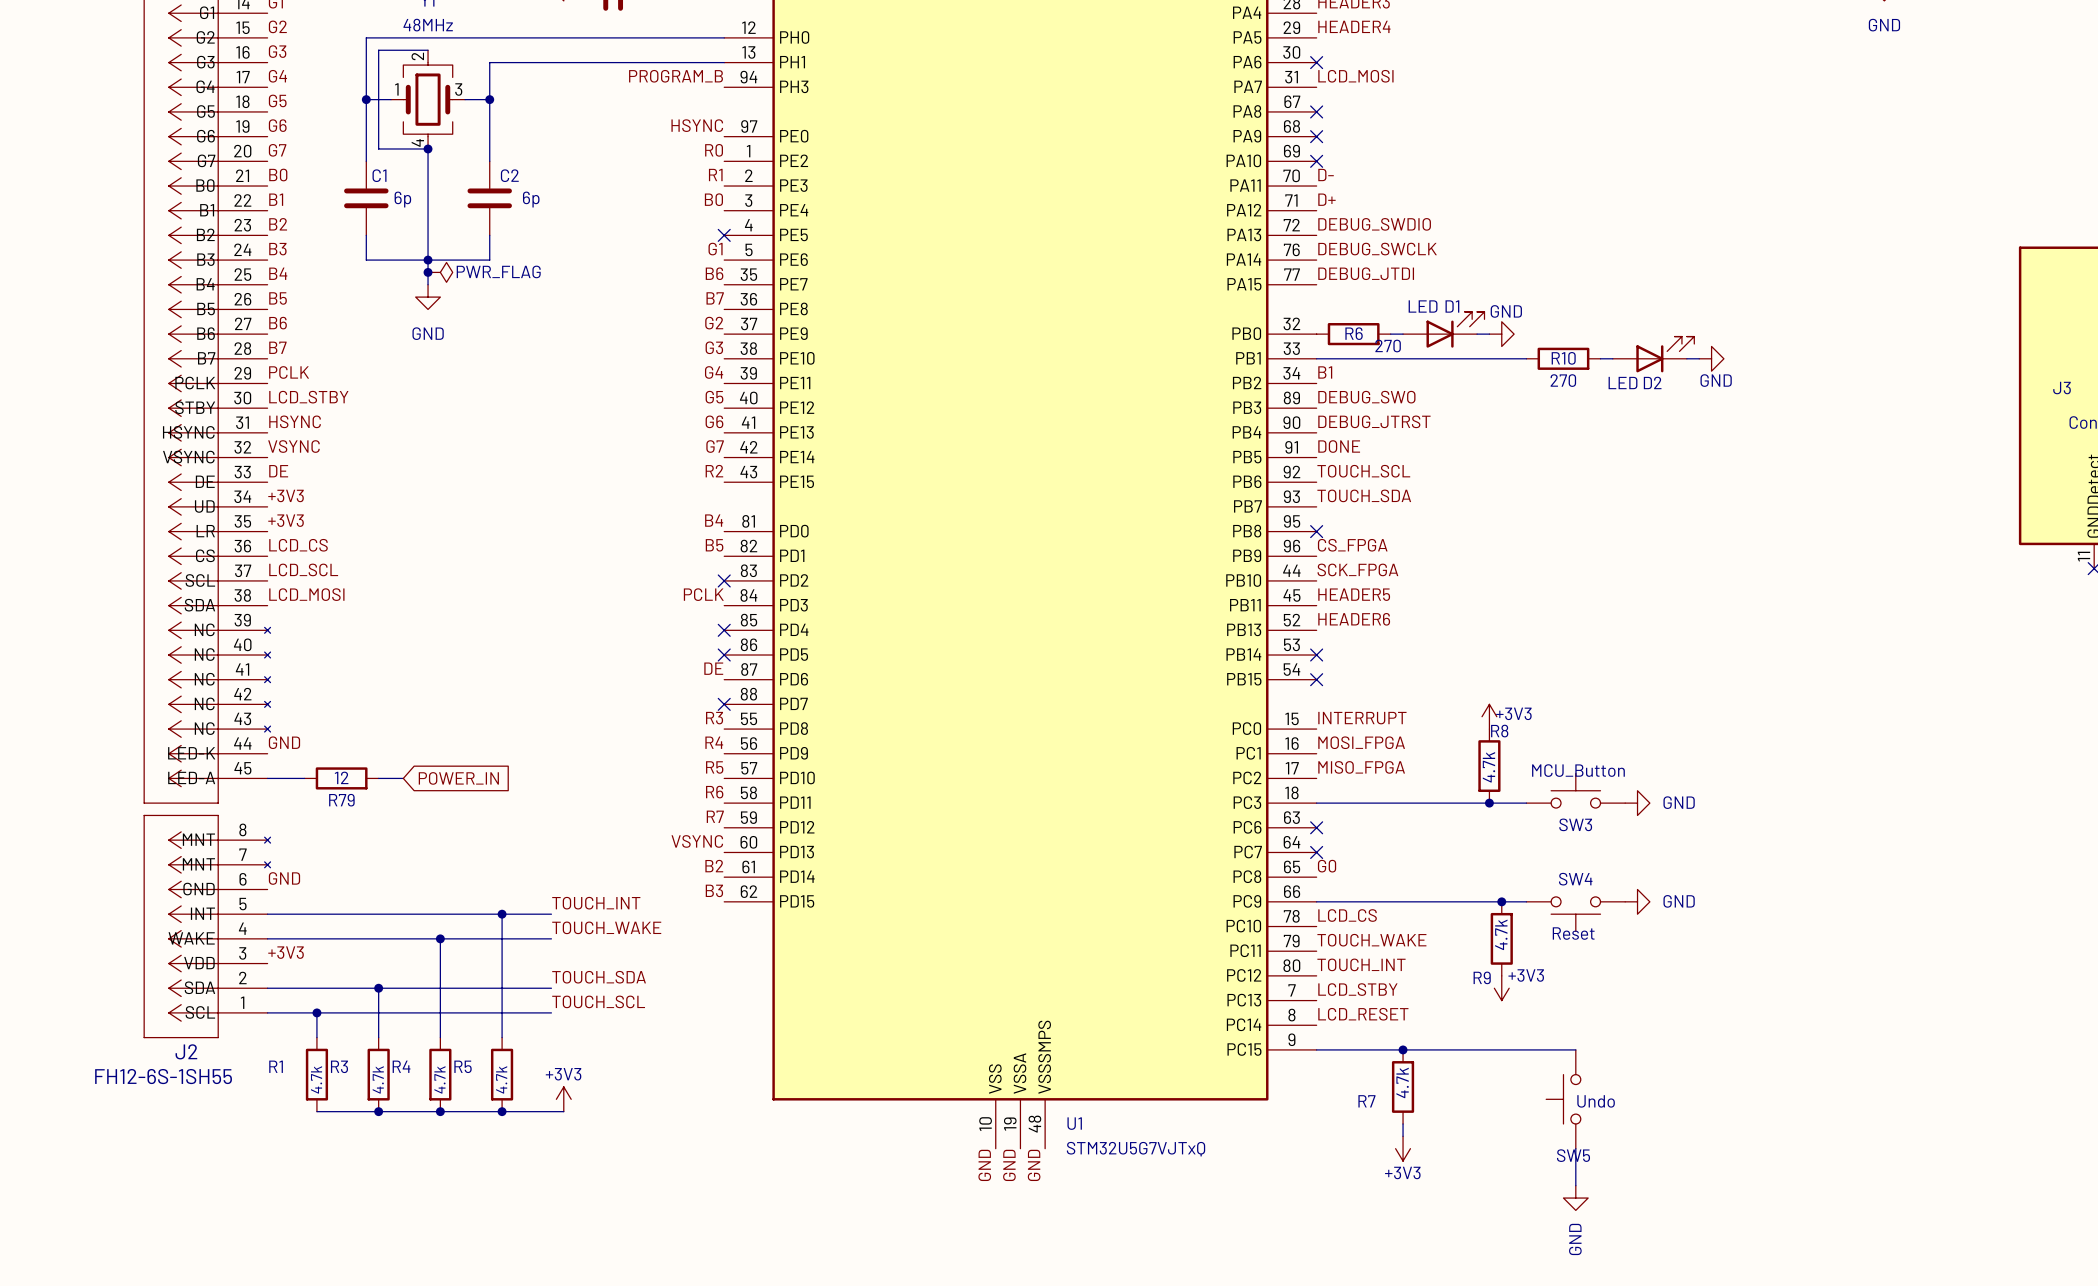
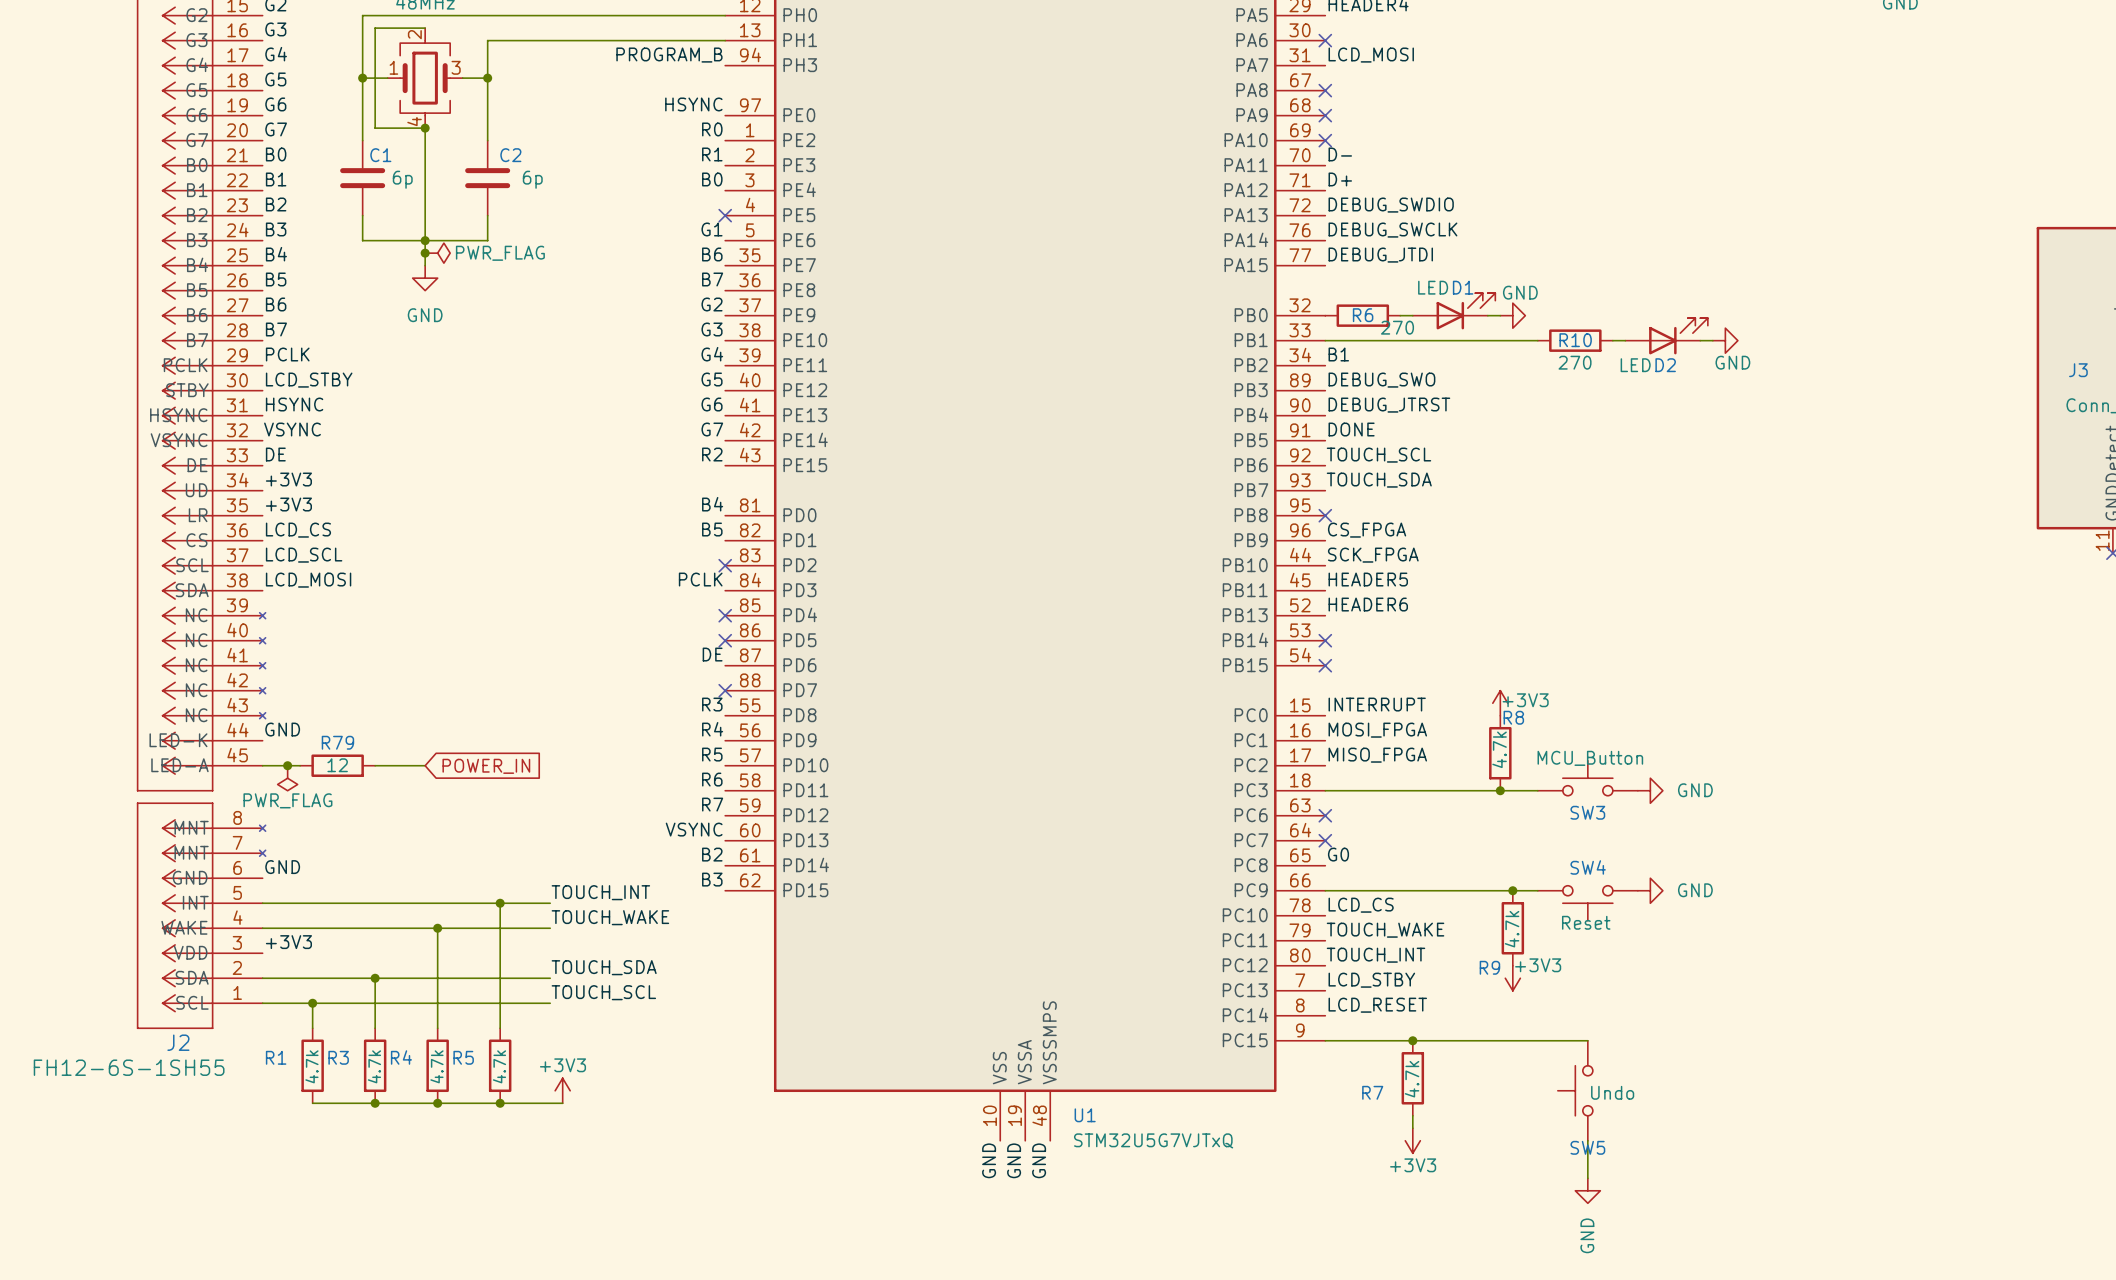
junction: none -> (287, 765)
wire: none -> (400, 765) (425, 765)
global label position: POWER_IN (458, 778) -> POWER_IN (486, 766)
power symbol: none -> PWR_FLAG (287, 778)
R79 name position: R79 (341, 800) -> R79 (337, 742)

